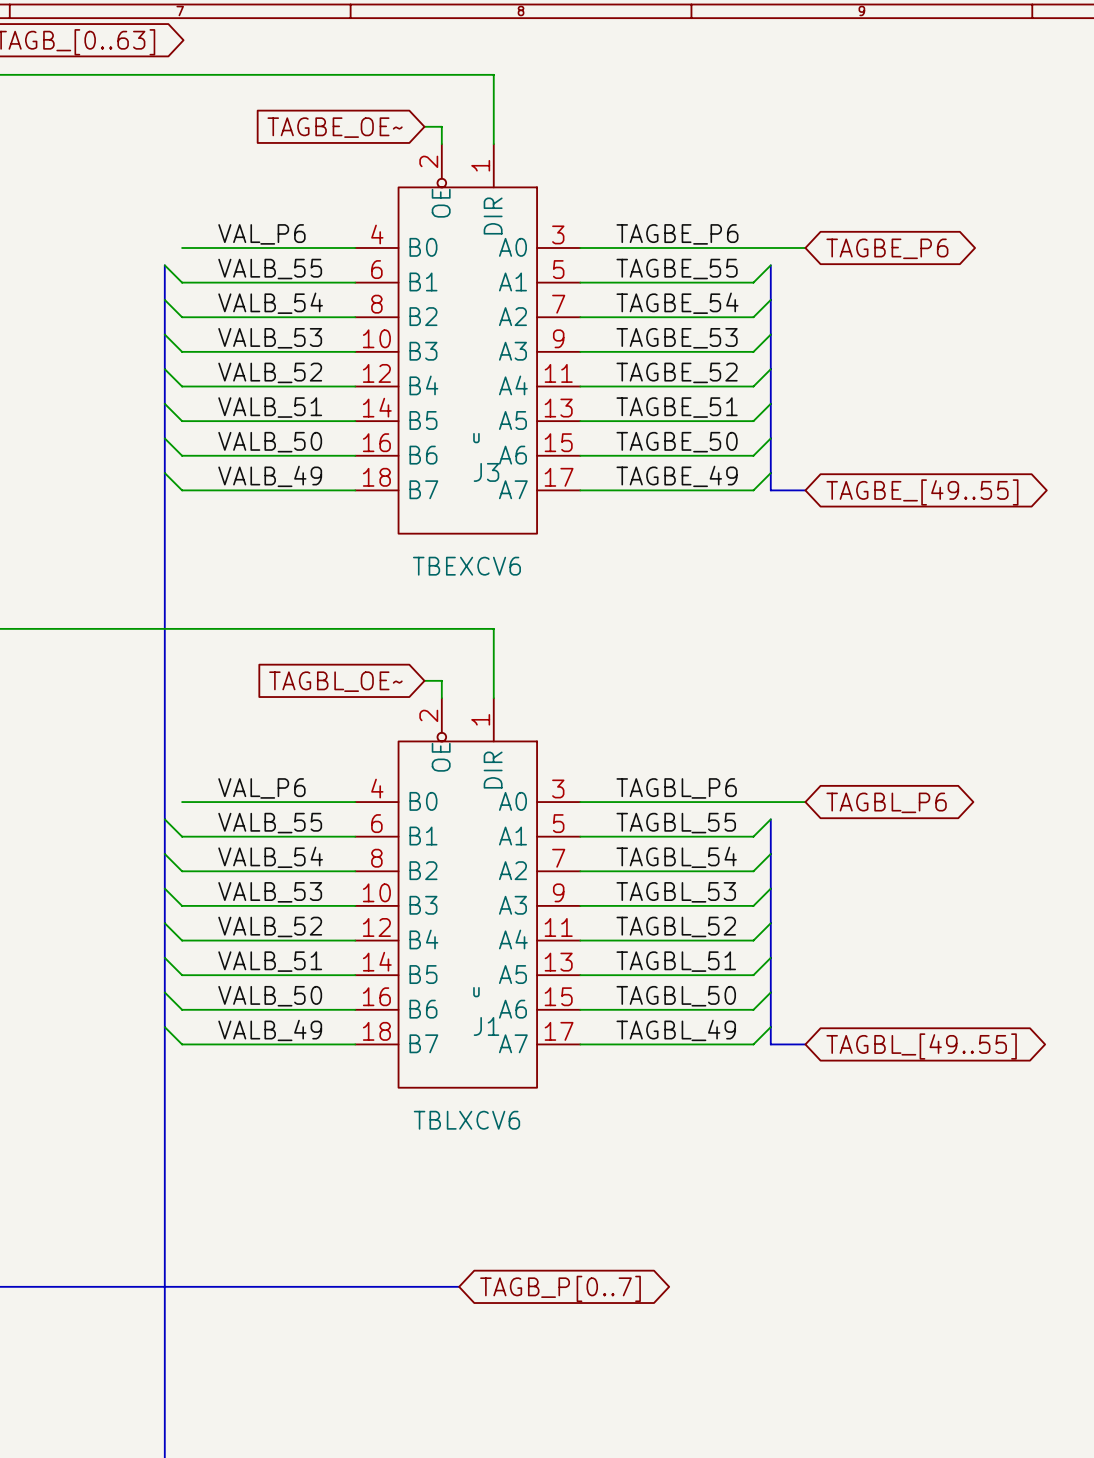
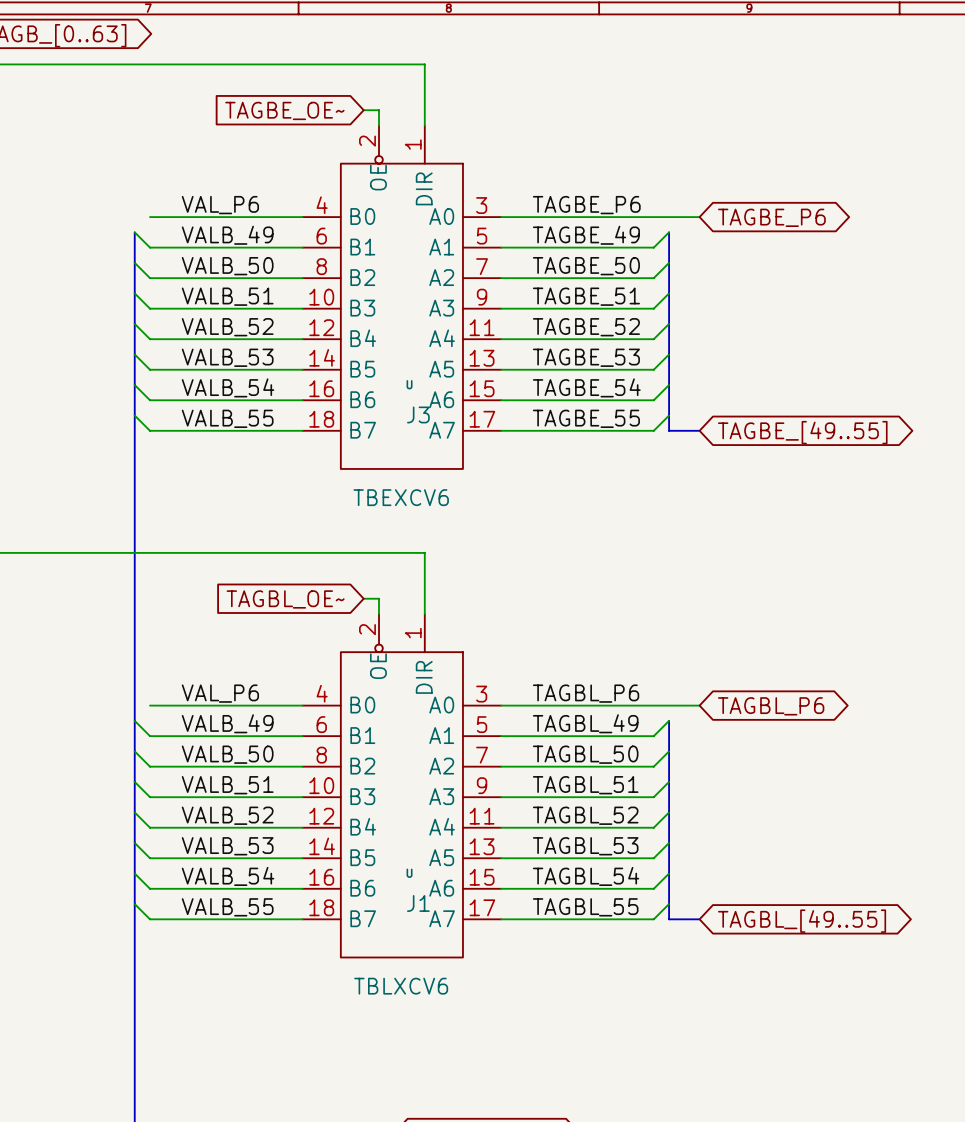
label: VALB_55 (270, 269) -> VALB_49 (227, 235)
label: TAGBE_55 (677, 269) -> TAGBE_49 (586, 235)
label: VALB_54 (270, 303) -> VALB_50 (227, 266)
label: TAGBE_54 (677, 303) -> TAGBE_50 (586, 266)
label: VALB_53 (270, 338) -> VALB_51 (227, 296)
label: TAGBE_53 (677, 338) -> TAGBE_51 (586, 296)
label: VALB_51 (270, 407) -> VALB_53 (227, 357)
label: TAGBE_51 (677, 407) -> TAGBE_53 (586, 357)
label: VALB_50 (270, 442) -> VALB_54 (228, 387)
label: TAGBE_50 (677, 442) -> TAGBE_54 (586, 387)
label: VALB_49 (270, 476) -> VALB_55 (227, 418)
label: TAGBE_49 (677, 476) -> TAGBE_55 (586, 418)
label: VALB_55 (270, 823) -> VALB_49 (227, 723)
label: TAGBL_55 (676, 823) -> TAGBL_49 (585, 723)
label: VALB_54 (270, 857) -> VALB_50 (227, 754)
label: TAGBL_54 (676, 857) -> TAGBL_50 (585, 754)
label: VALB_53 (270, 892) -> VALB_51 (227, 785)
label: TAGBL_53 (676, 892) -> TAGBL_51 (585, 785)
label: VALB_51 (270, 961) -> VALB_53 (227, 846)
label: TAGBL_51 (676, 961) -> TAGBL_53 (585, 846)
label: VALB_50 (270, 996) -> VALB_54 (228, 876)
label: TAGBL_50 (676, 996) -> TAGBL_54 (586, 876)
label: VALB_49 (270, 1030) -> VALB_55 (227, 907)
label: TAGBL_49 (676, 1030) -> TAGBL_55 (585, 907)

